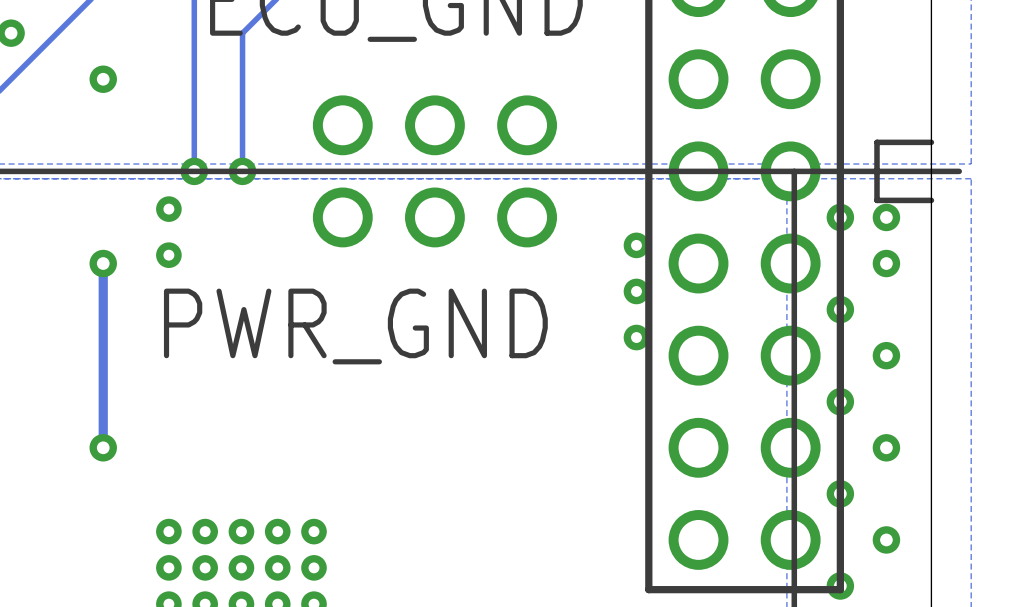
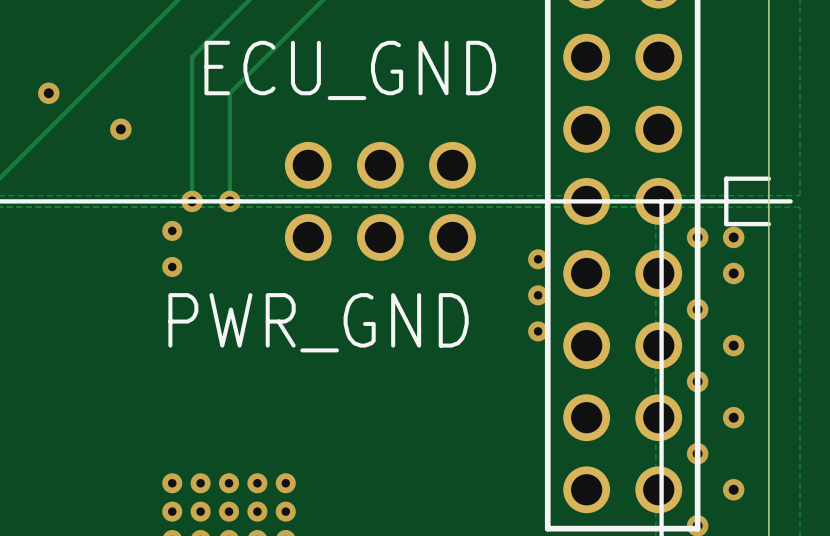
track: (103, 263) (103, 447) -> none
via: (103, 263) -> none
via: (103, 447) -> none

